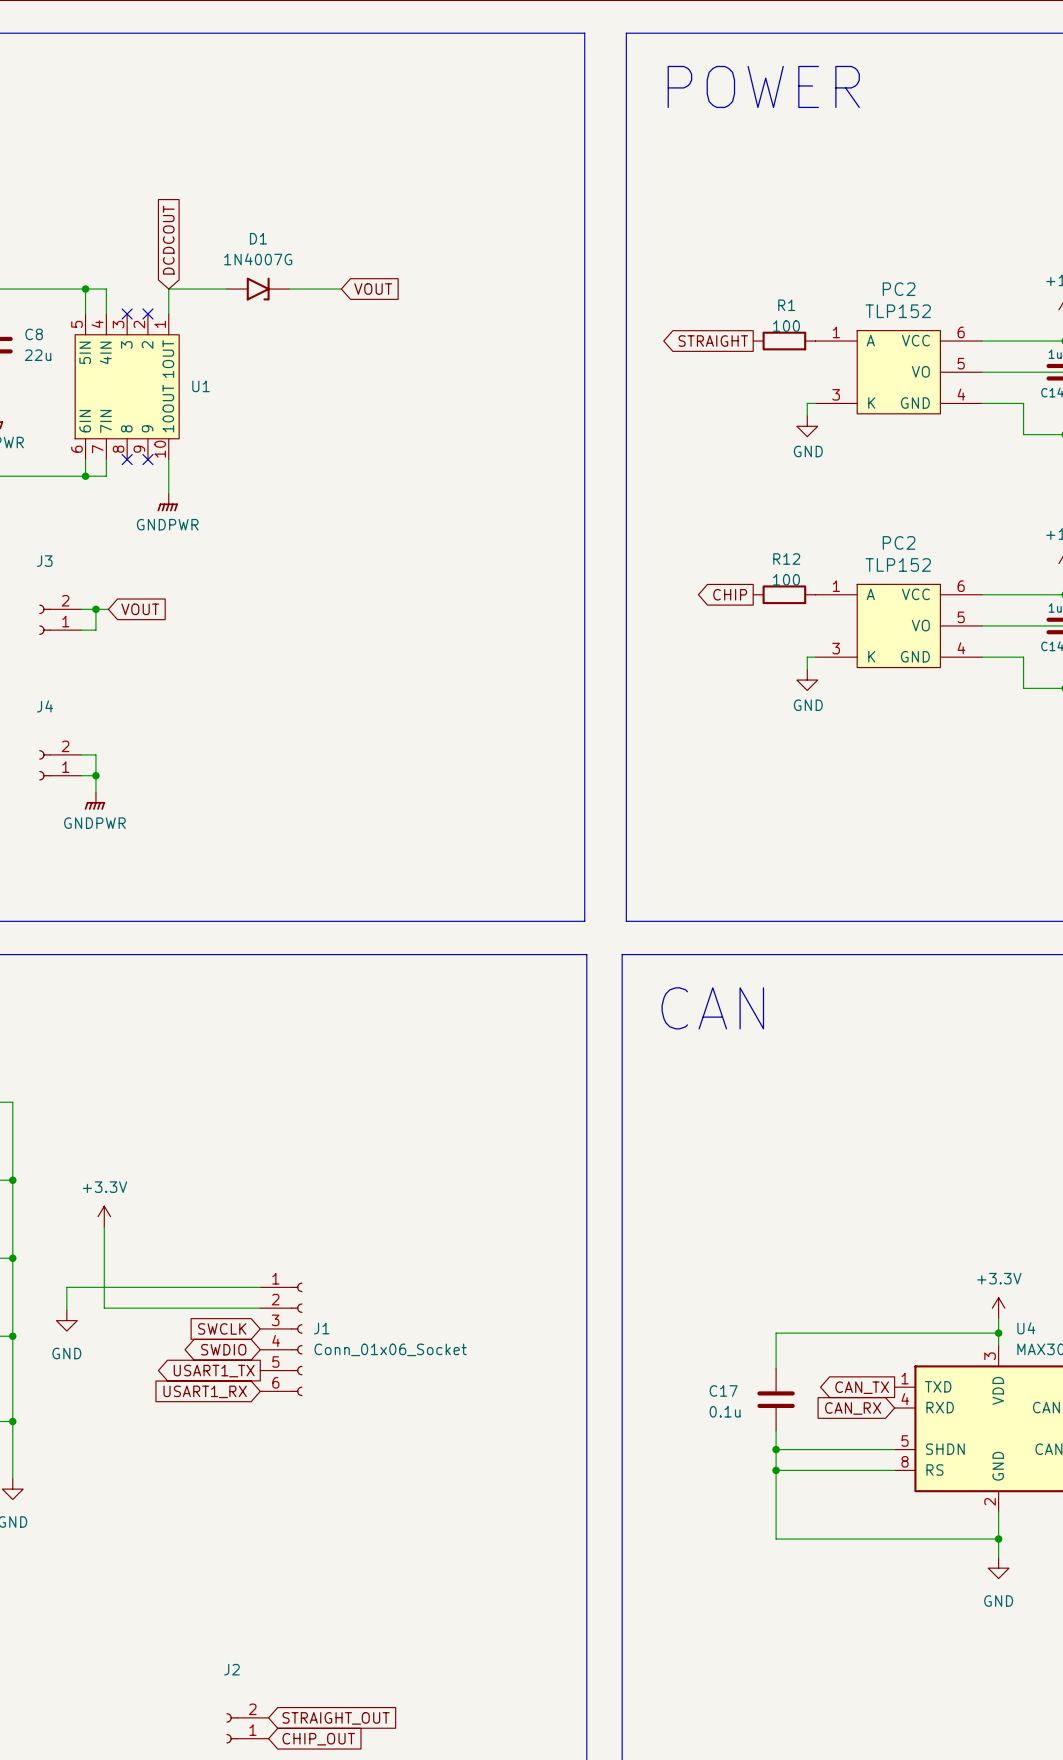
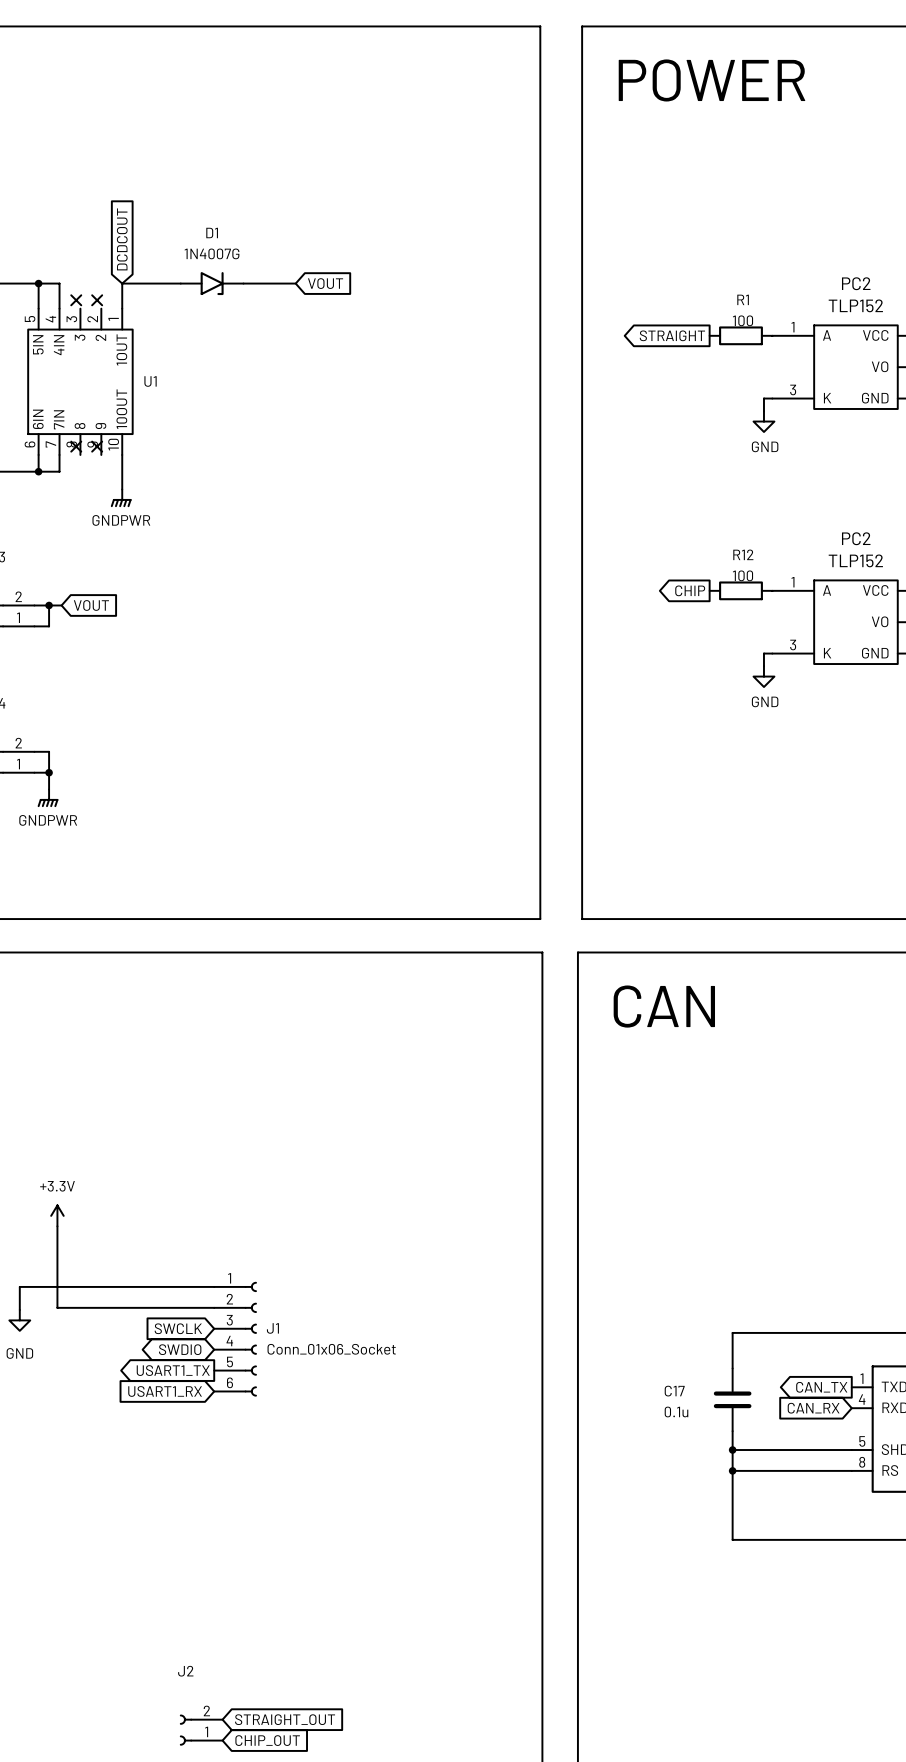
no-connect mark: none -> (76, 300)
no-connect mark: none -> (97, 300)
no-connect mark: (127, 313) -> none
no-connect mark: (147, 313) -> none
no-connect mark: none -> (76, 446)
no-connect mark: none -> (97, 446)
no-connect mark: (127, 459) -> none
no-connect mark: (147, 459) -> none

